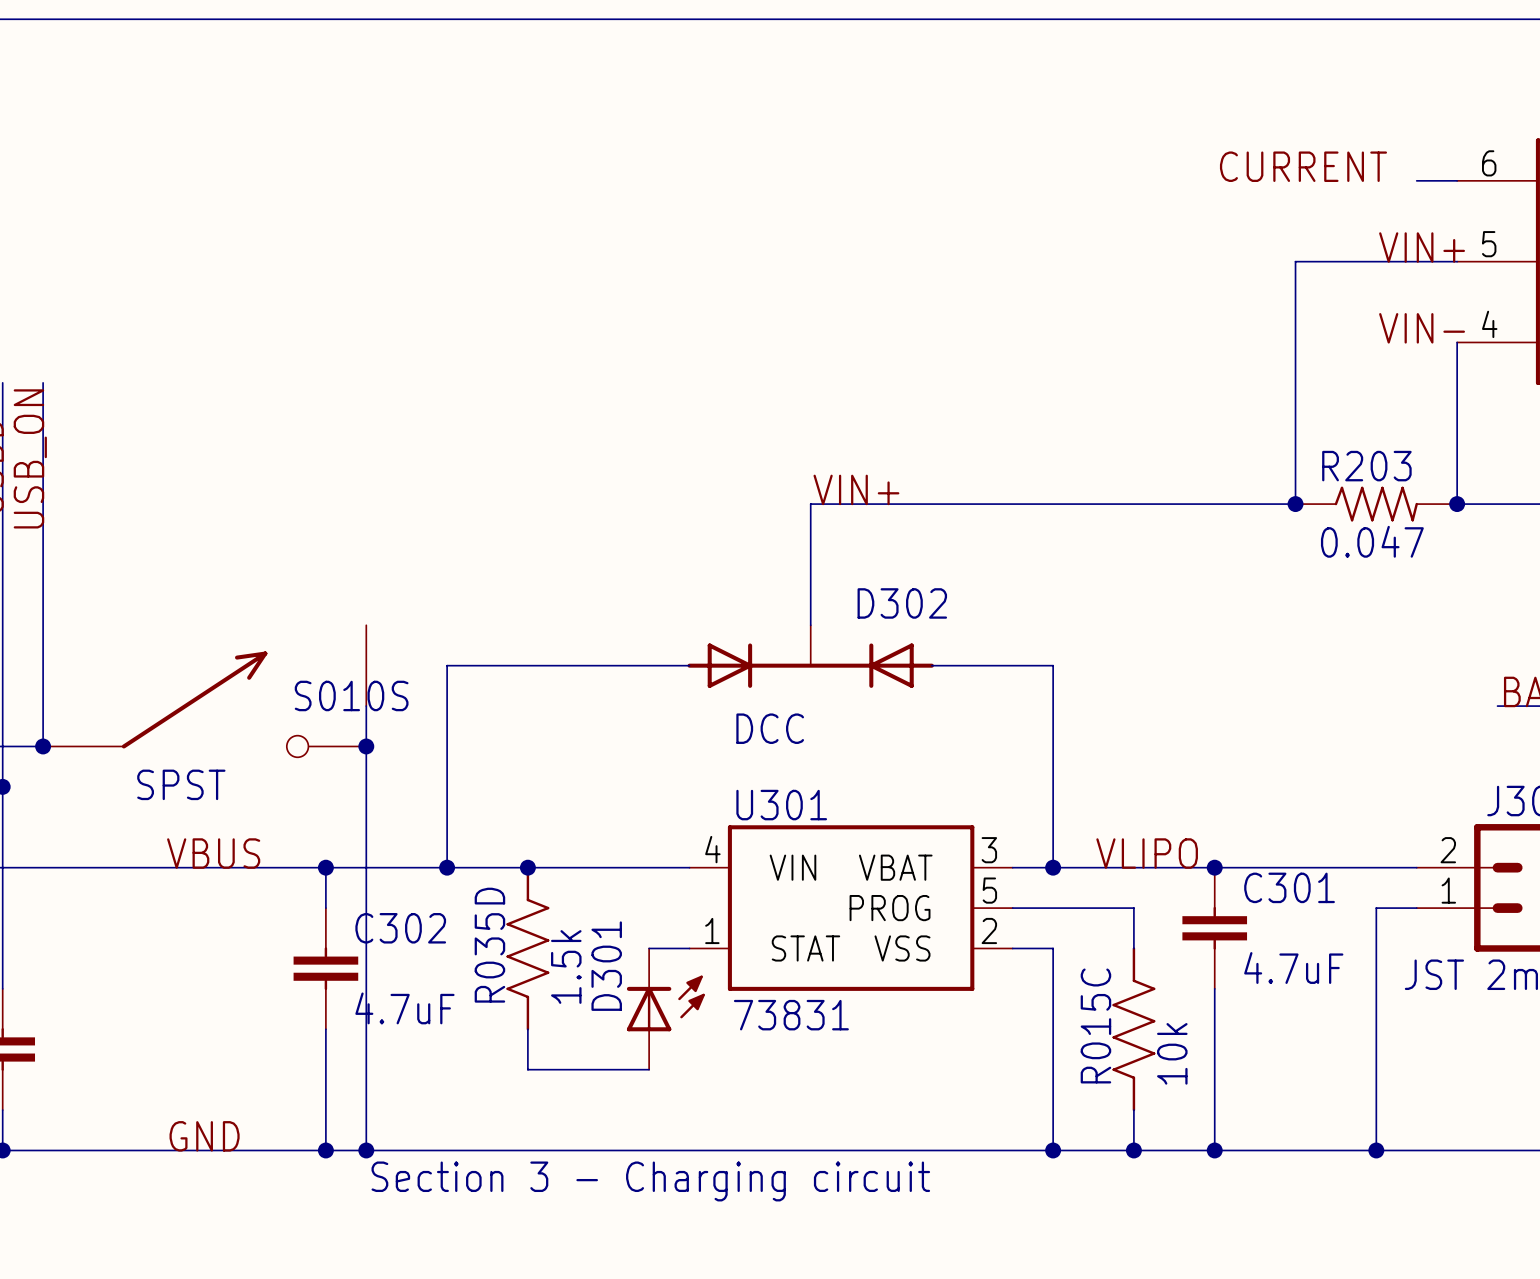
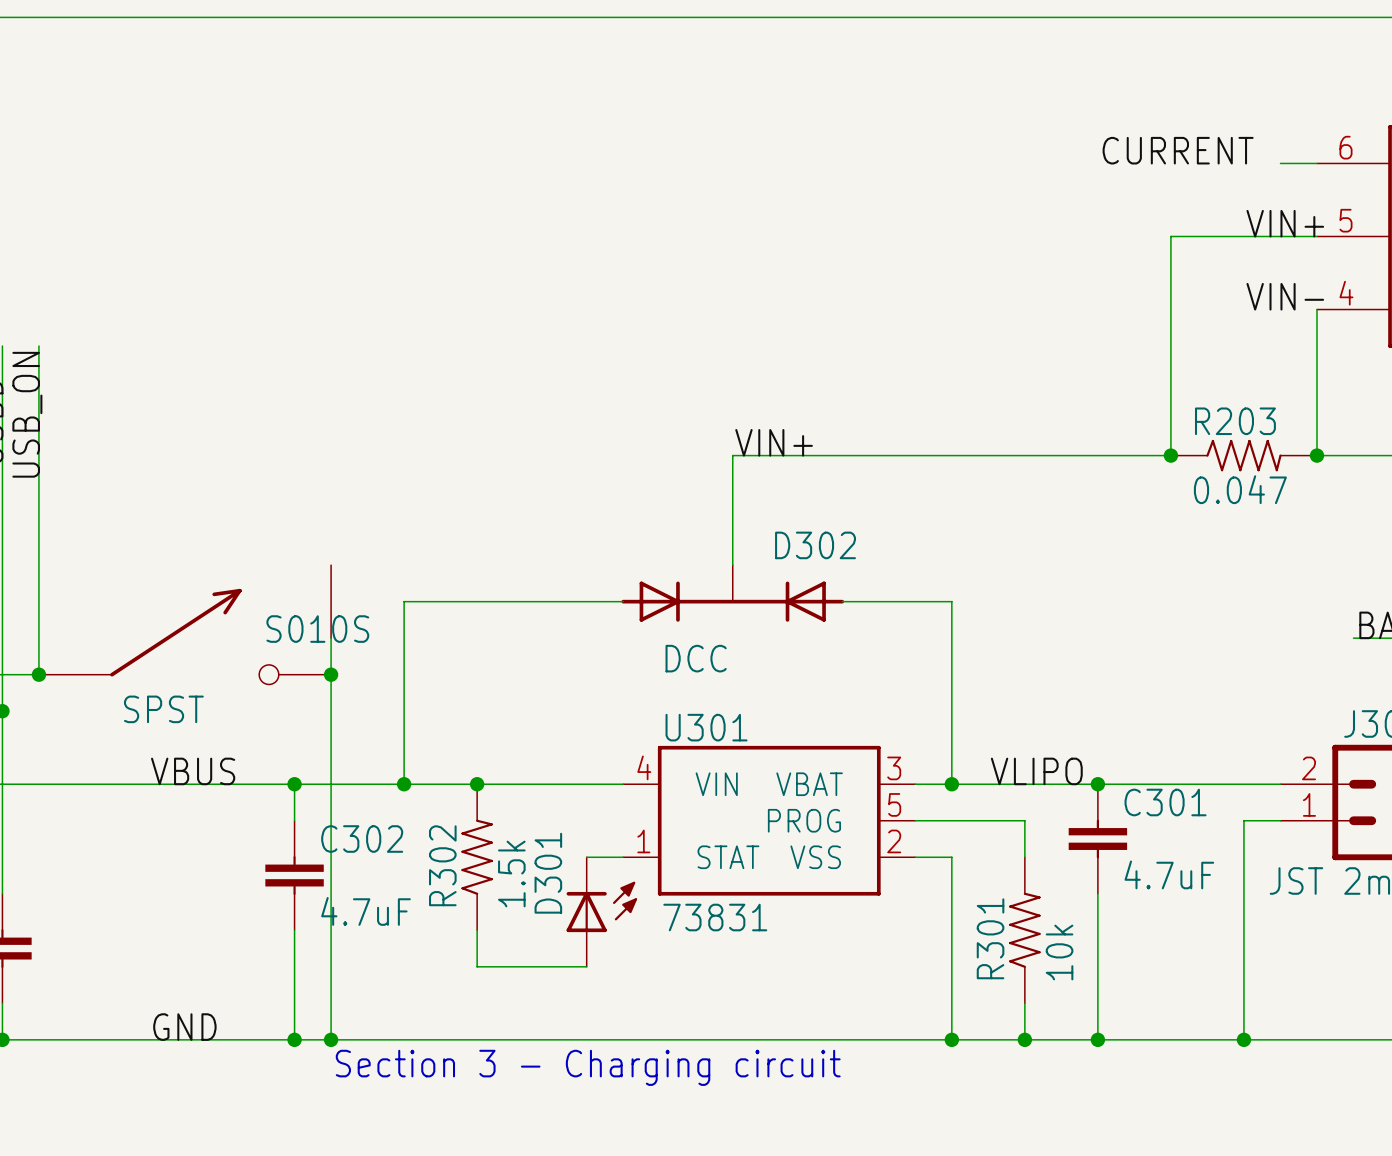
R035D: 1.5k (527, 948) -> none
R302: none -> 1.5k (477, 857)
R015C: 10k (1133, 1029) -> none
R301: none -> 10k (1024, 930)

